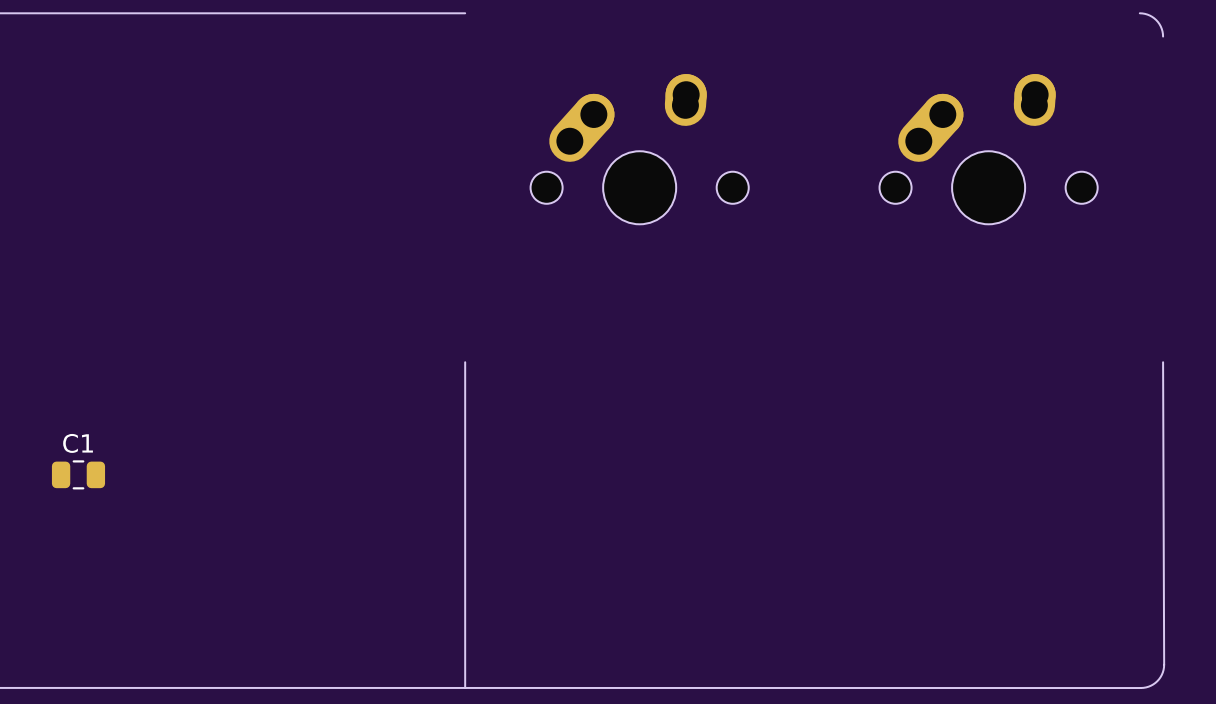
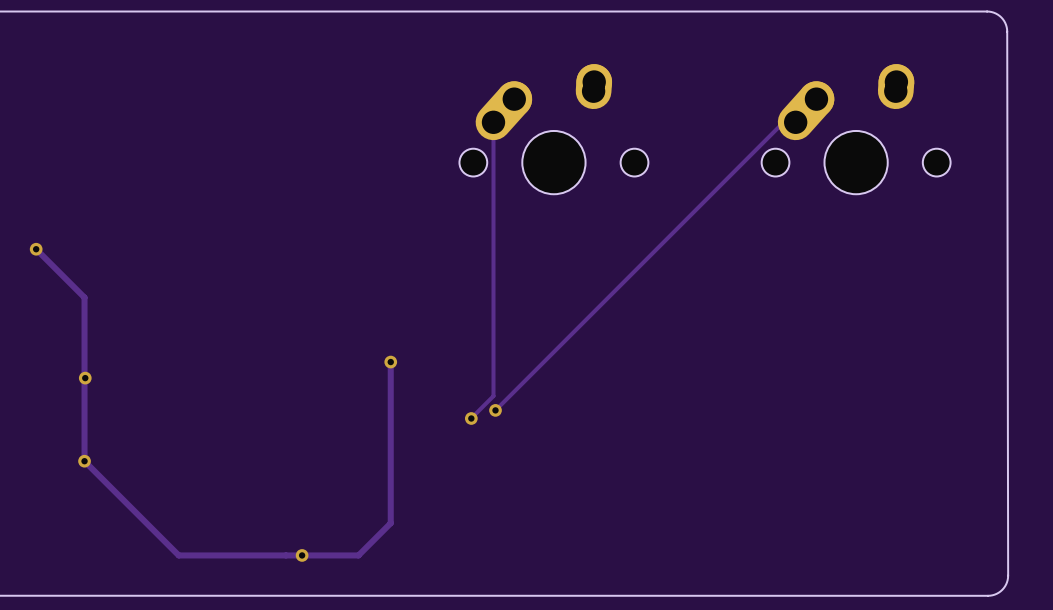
board edge: none -> (402, 11) (987, 11)
track: none -> (493, 122) (493, 396) (471, 418)
track: none -> (795, 122) (783, 122) (495, 410)
track: none -> (36, 249) (84, 297) (84, 461) (178, 555) (358, 555) (390, 523) (390, 362)
via: none -> (36, 249)
board edge: (465, 362) (465, 687) -> none
board edge: (1163, 362) (1164, 664) -> (1007, 31) (1008, 575)
via: none -> (390, 362)
via: none -> (85, 378)
via: none -> (495, 410)
C1: (78, 474) -> none
via: none -> (471, 418)
via: none -> (84, 461)
via: none -> (302, 555)

